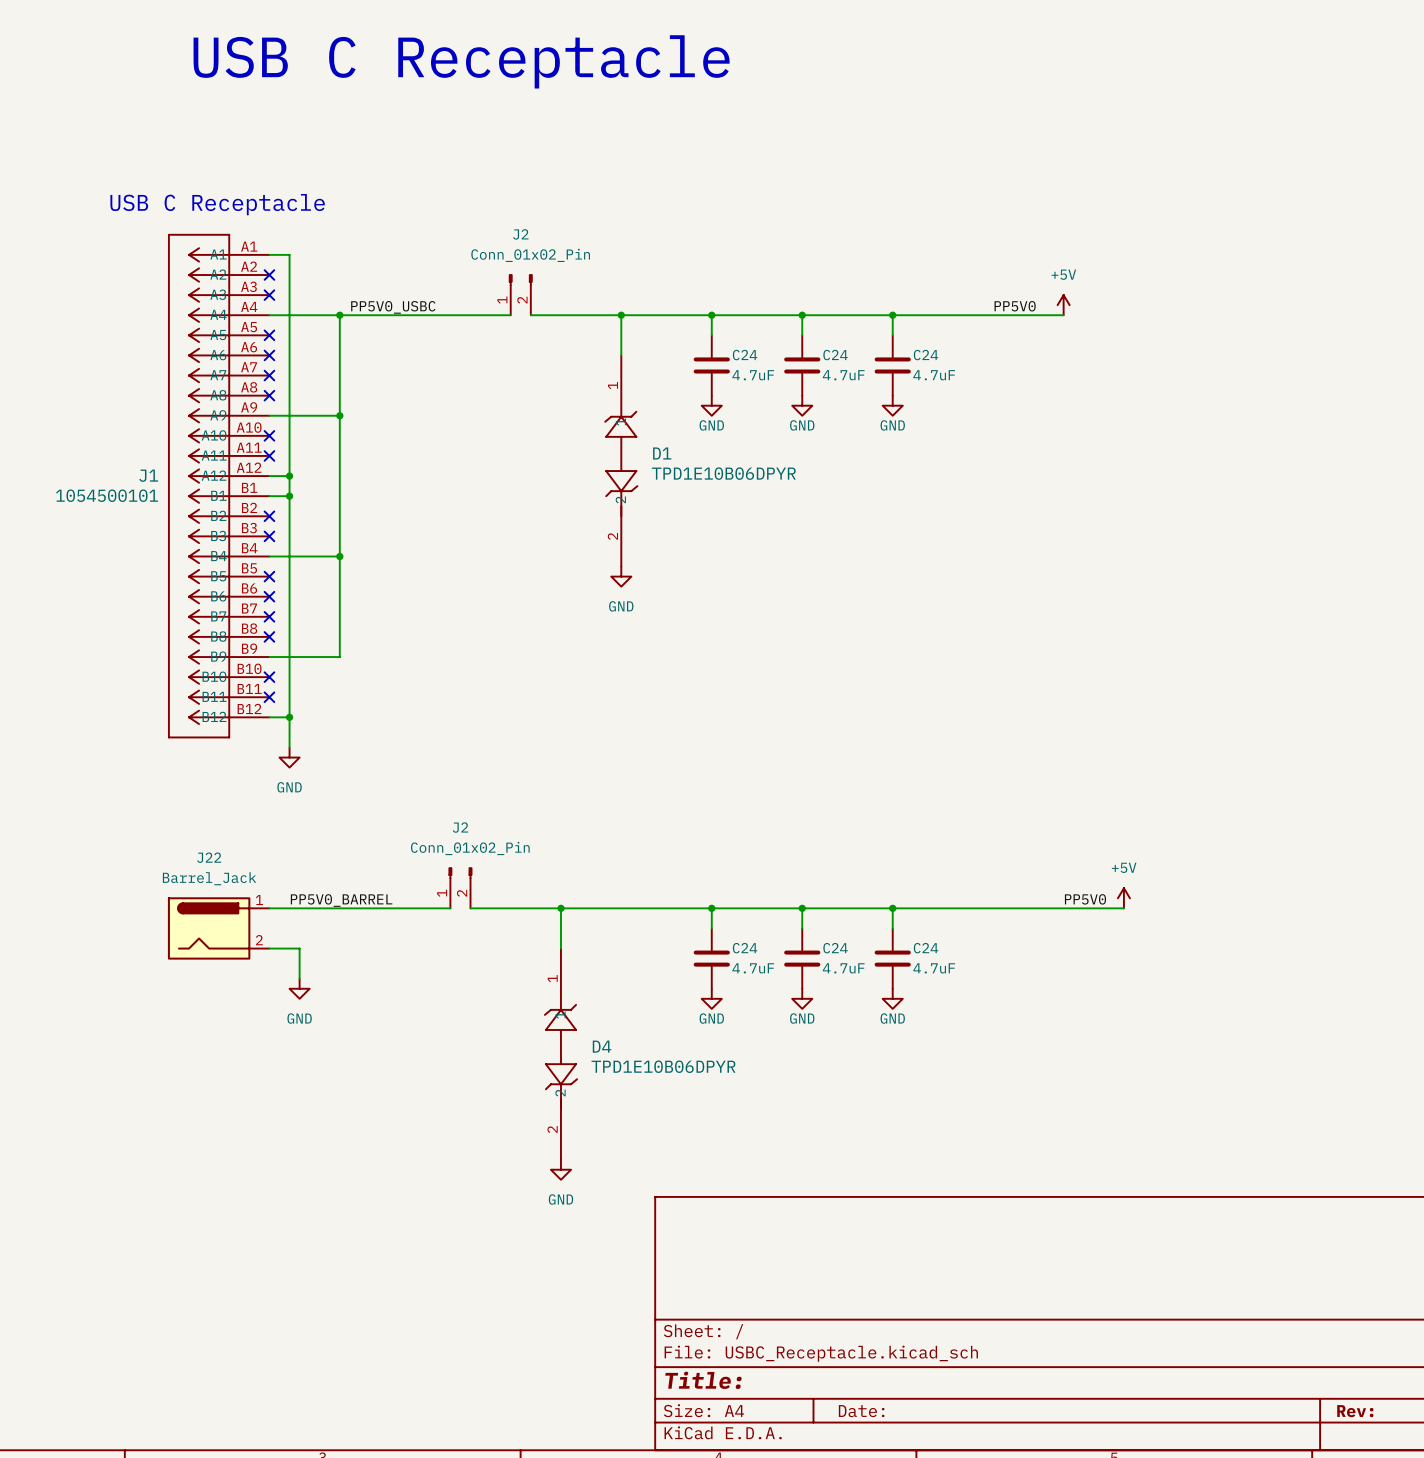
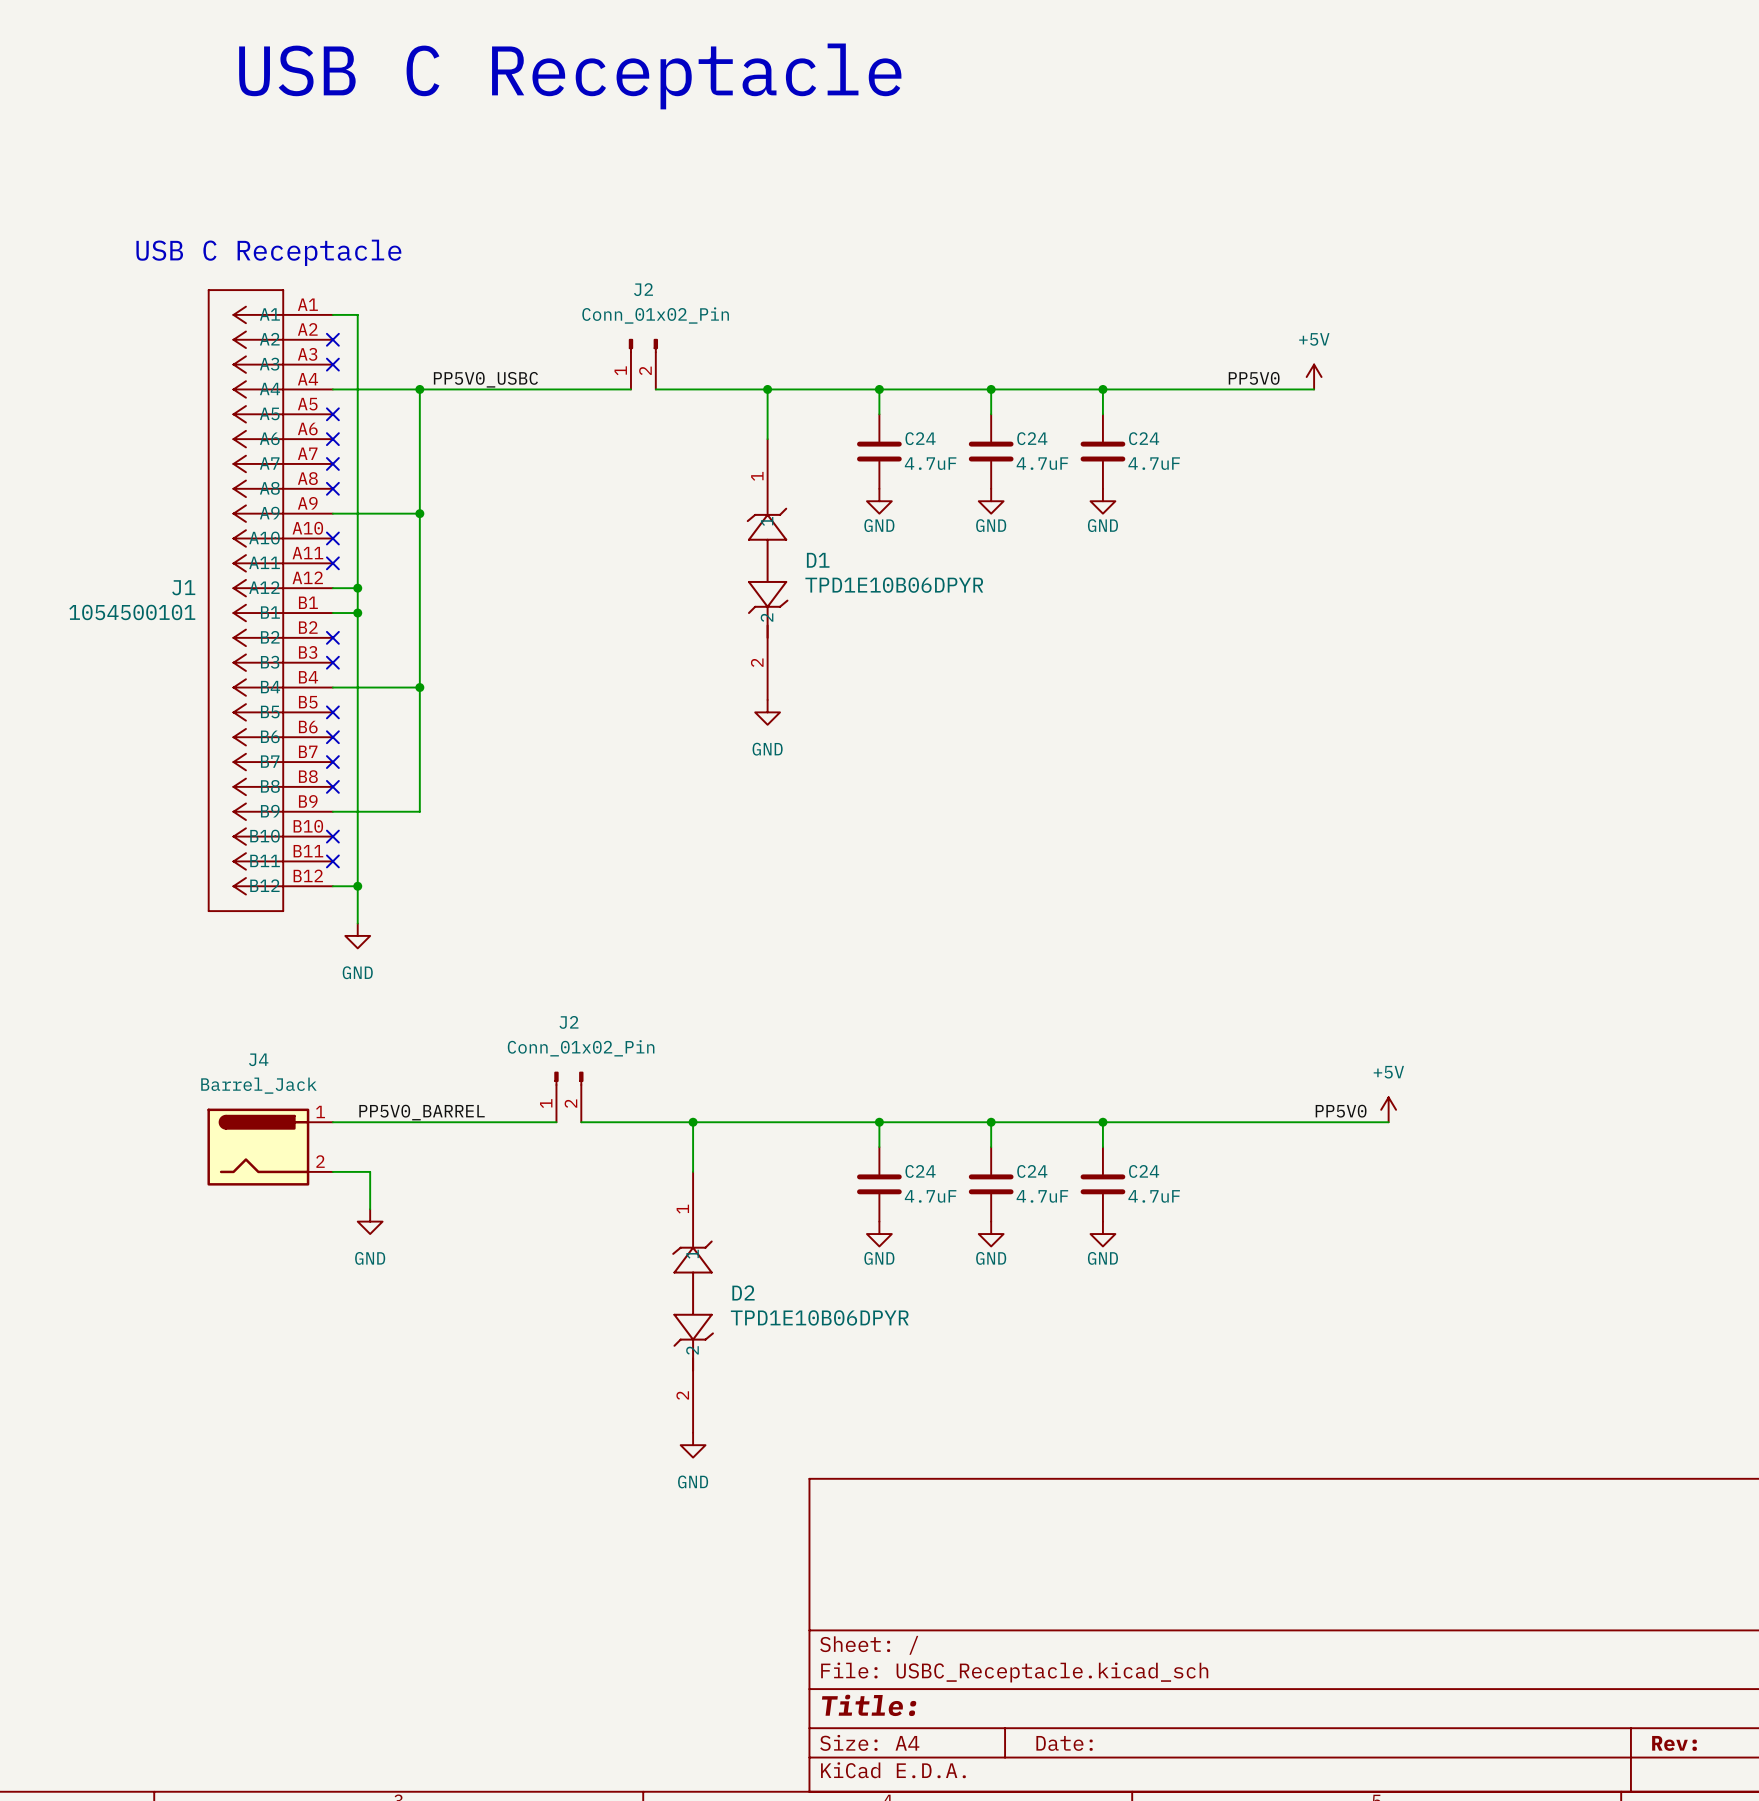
J22 name: J22 (209, 857) -> J4 (258, 1059)
D4 name: D4 (602, 1046) -> D2 (743, 1292)

